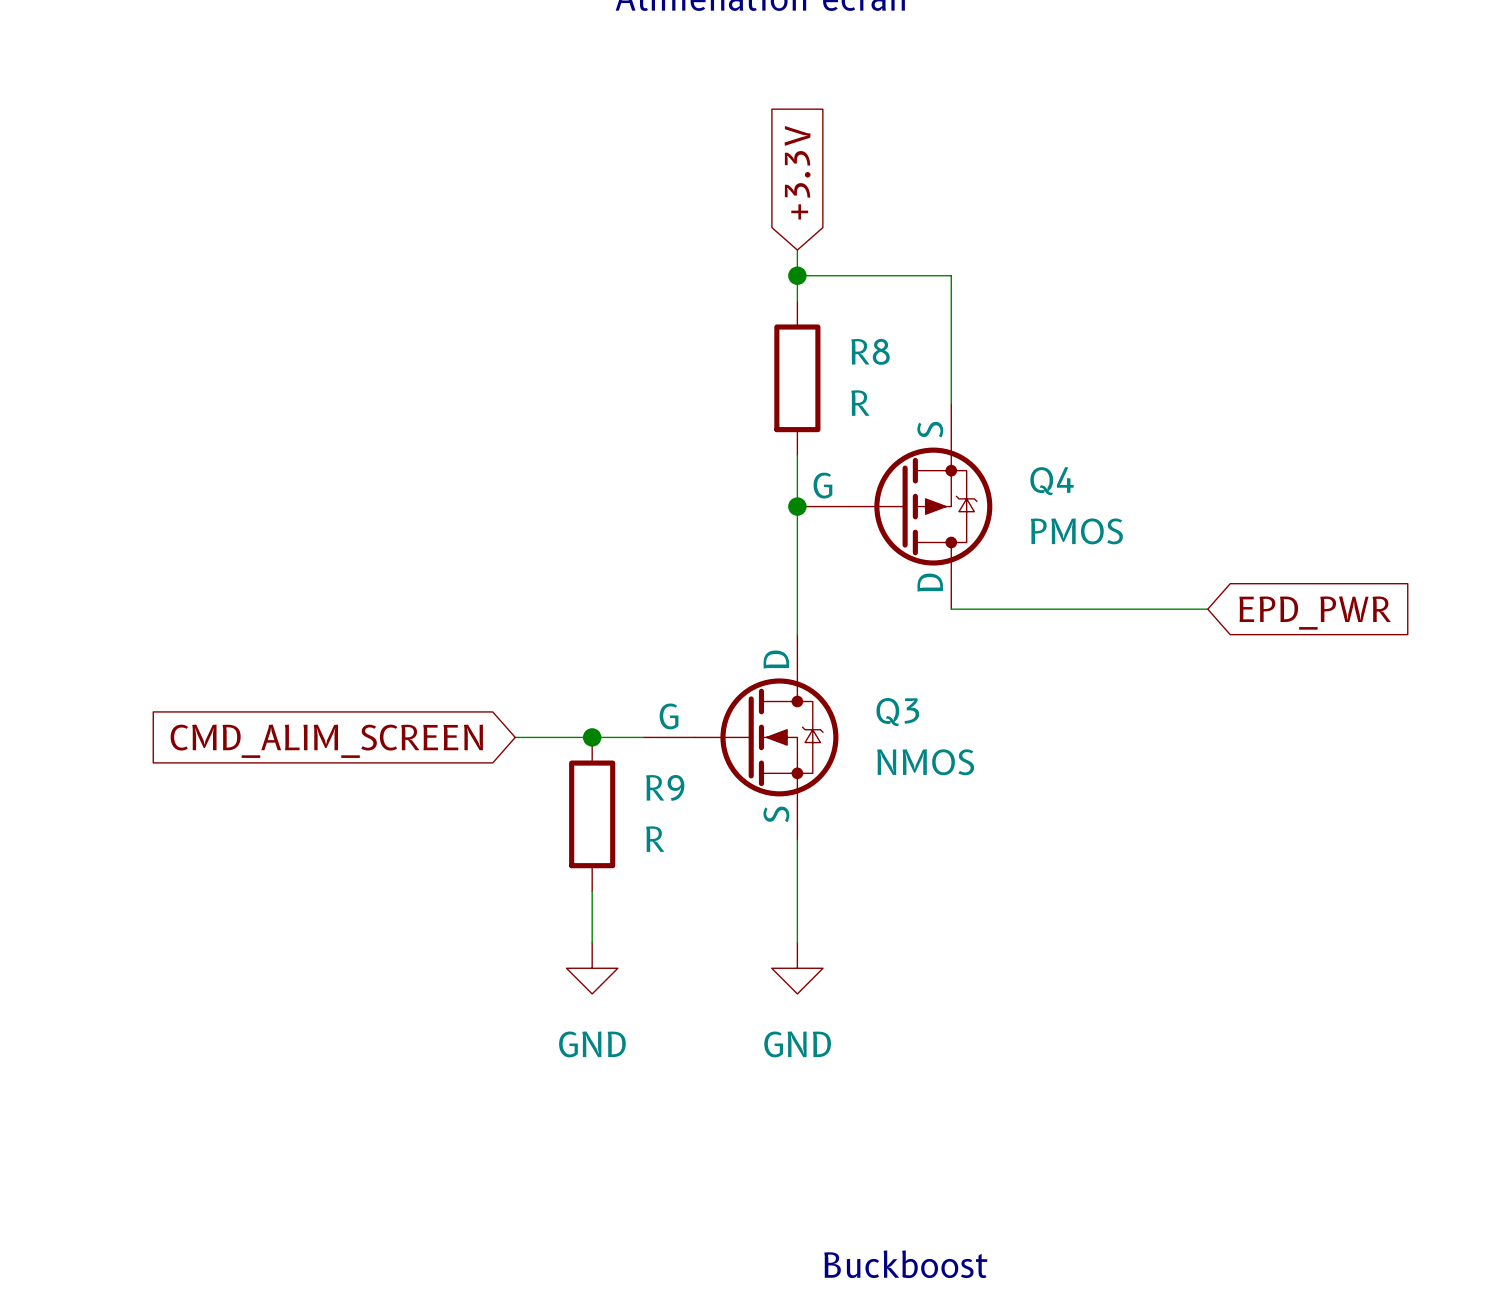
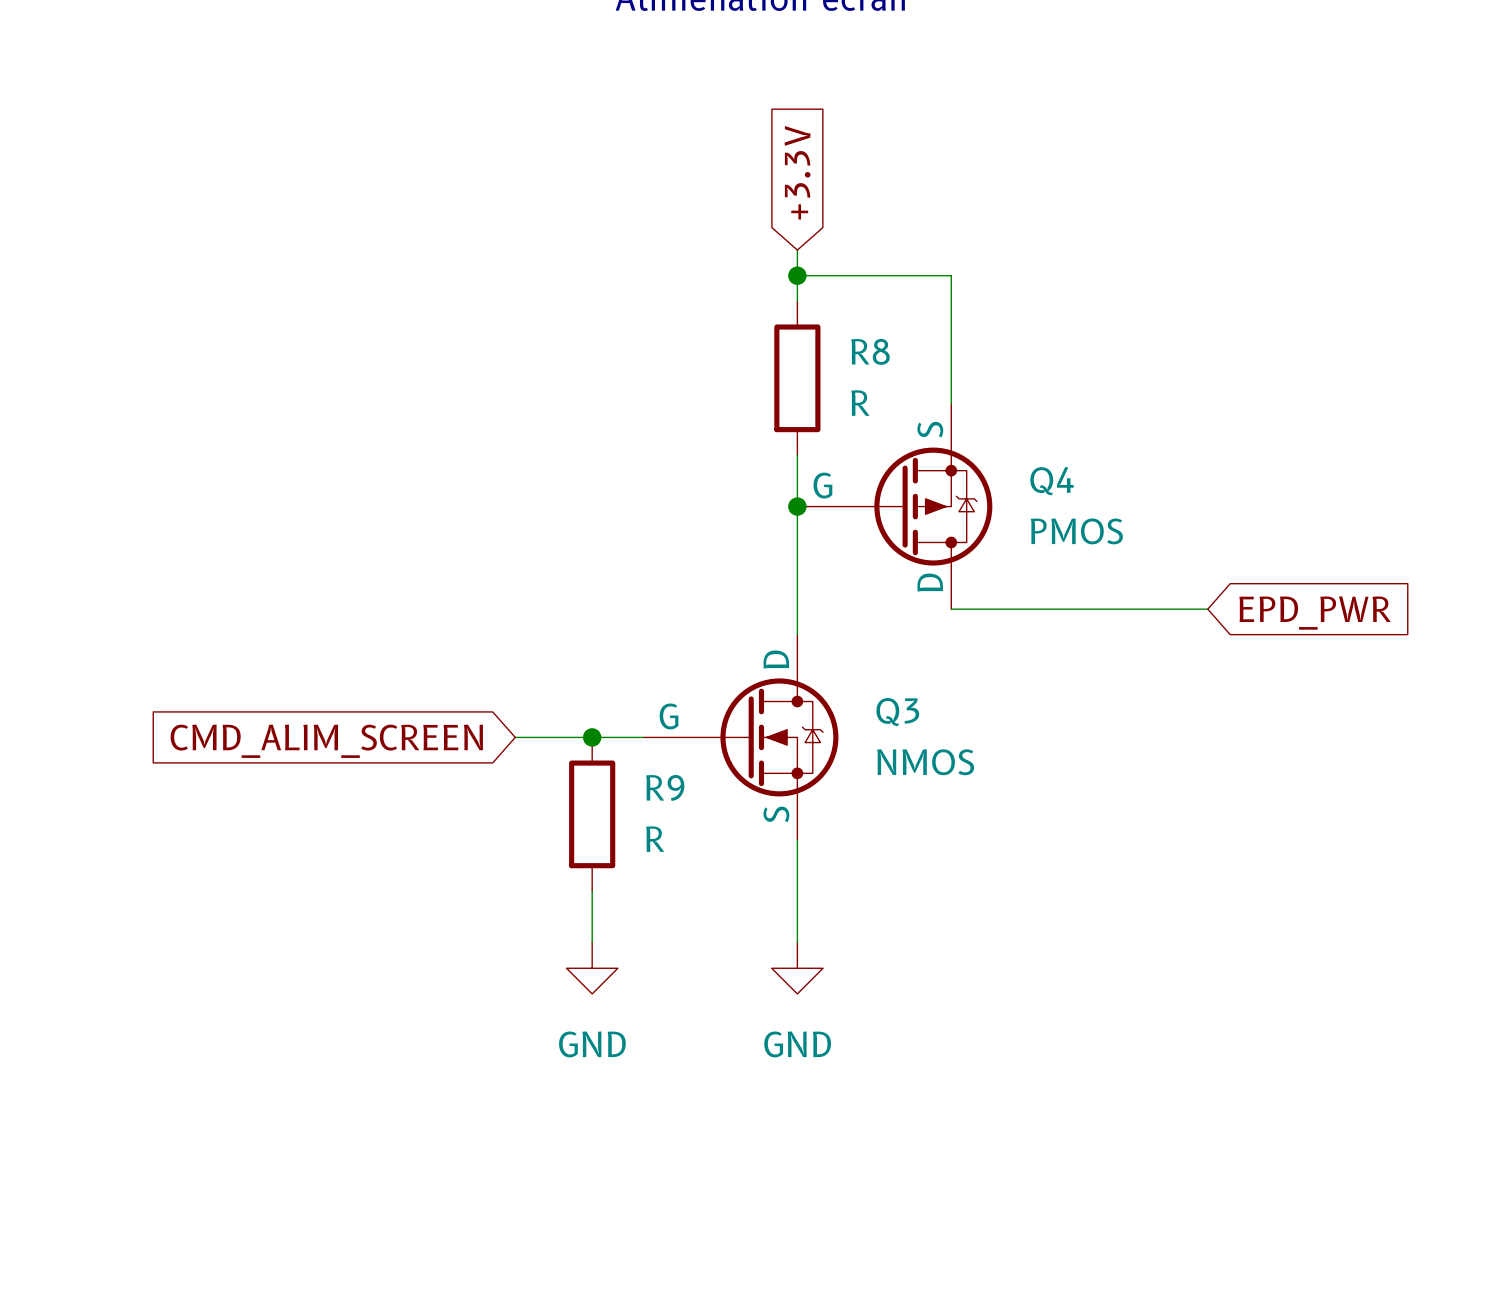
text: Buckboost (905, 1264) -> none

